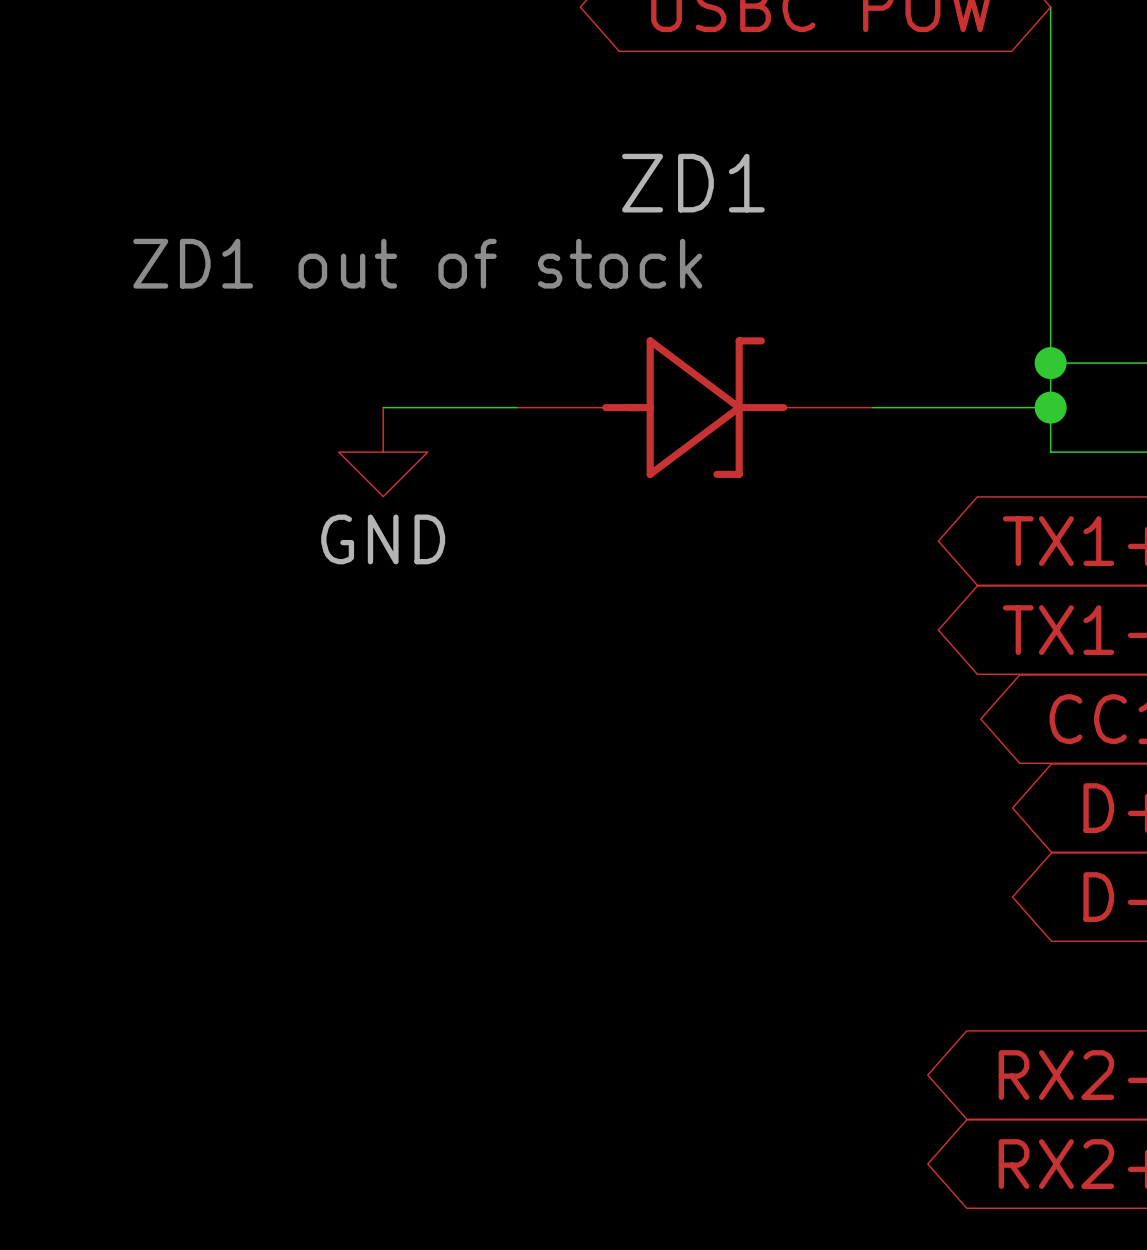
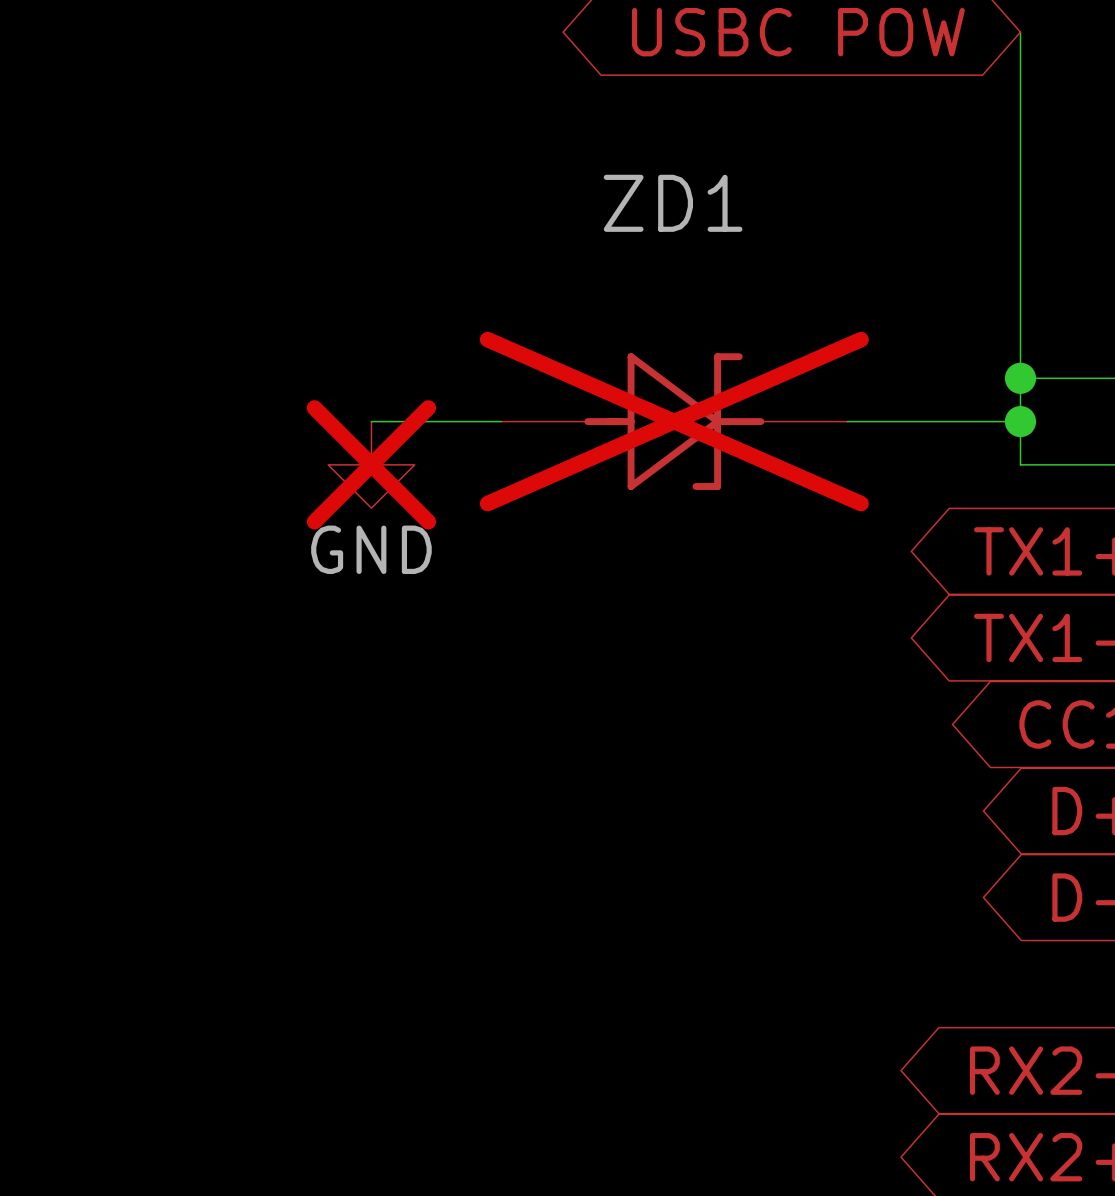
text: ZD1 out of stock (417, 263) -> none
ZD1 do-not-place cross: none -> (674, 421)
power symbol do-not-place cross: none -> (371, 464)

